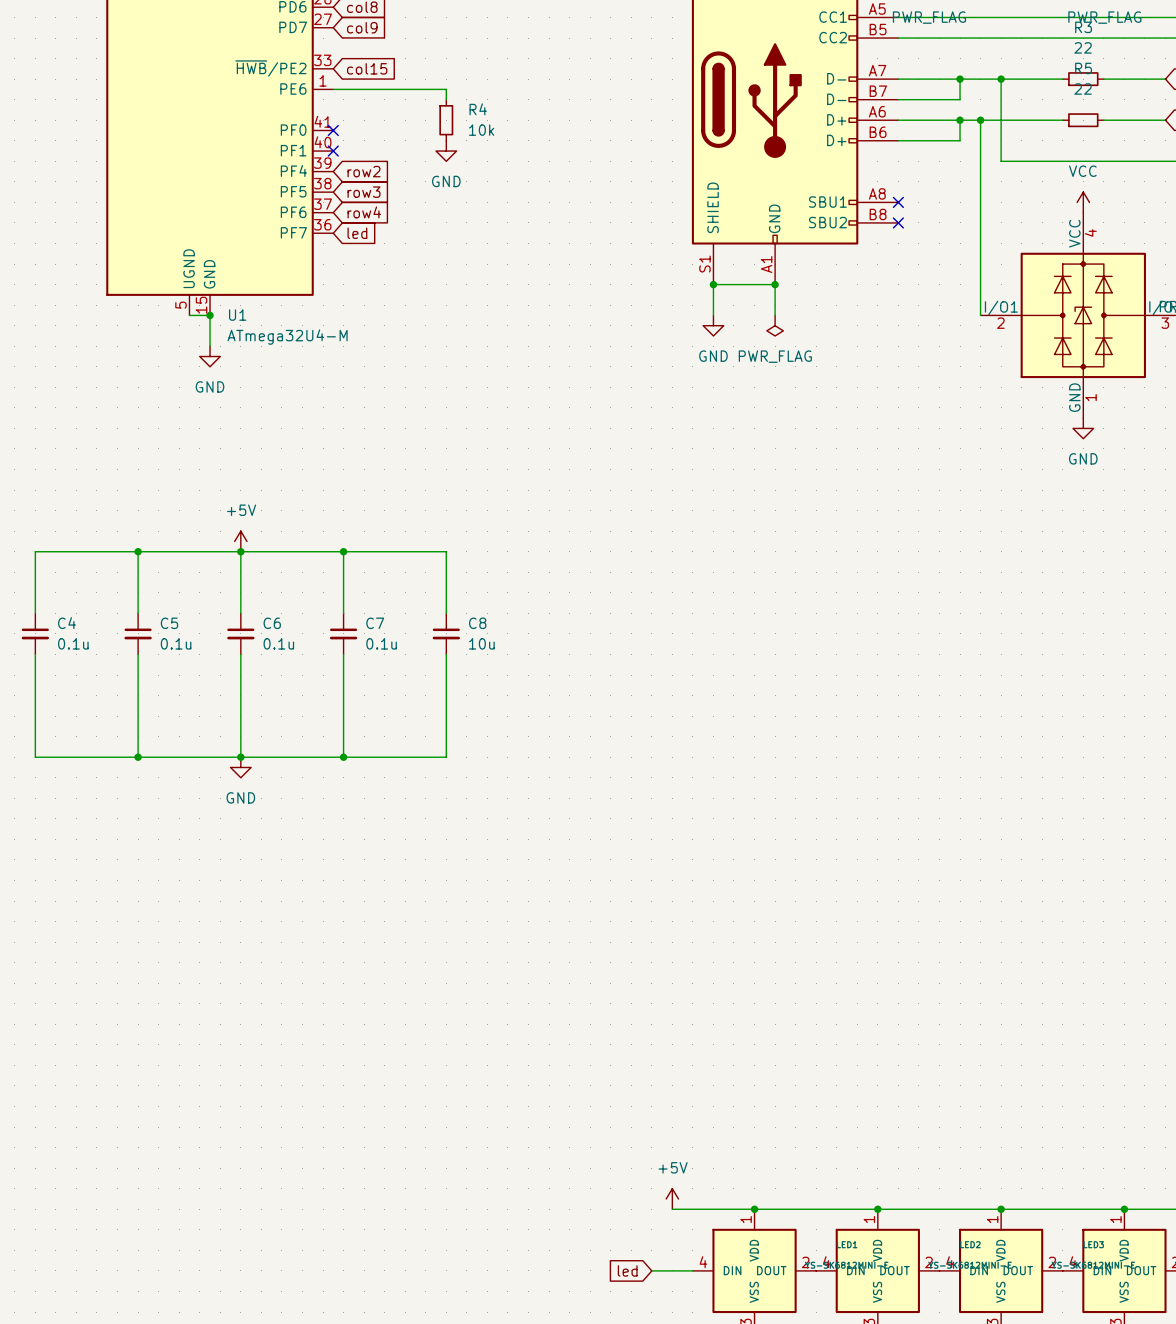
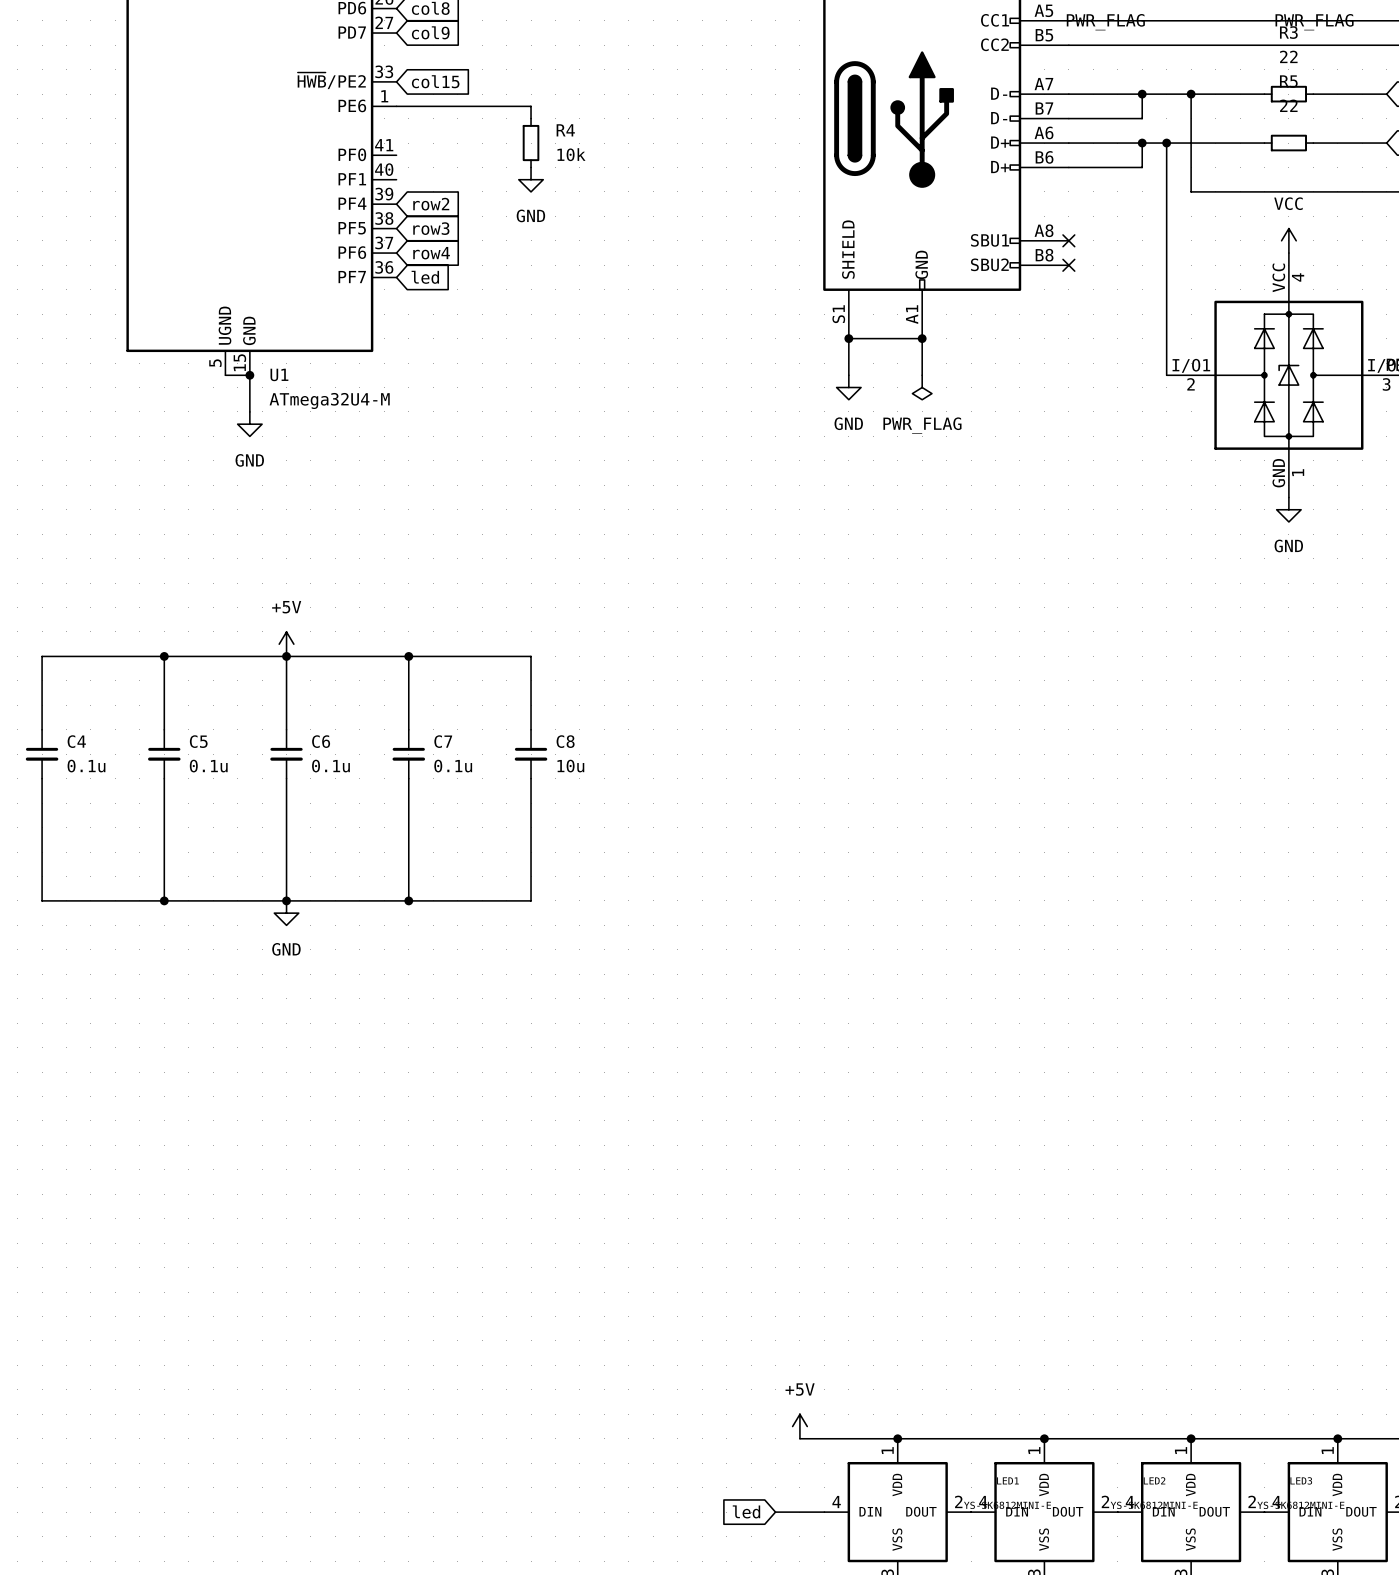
no-connect mark: (333, 130) -> none
no-connect mark: (333, 151) -> none

